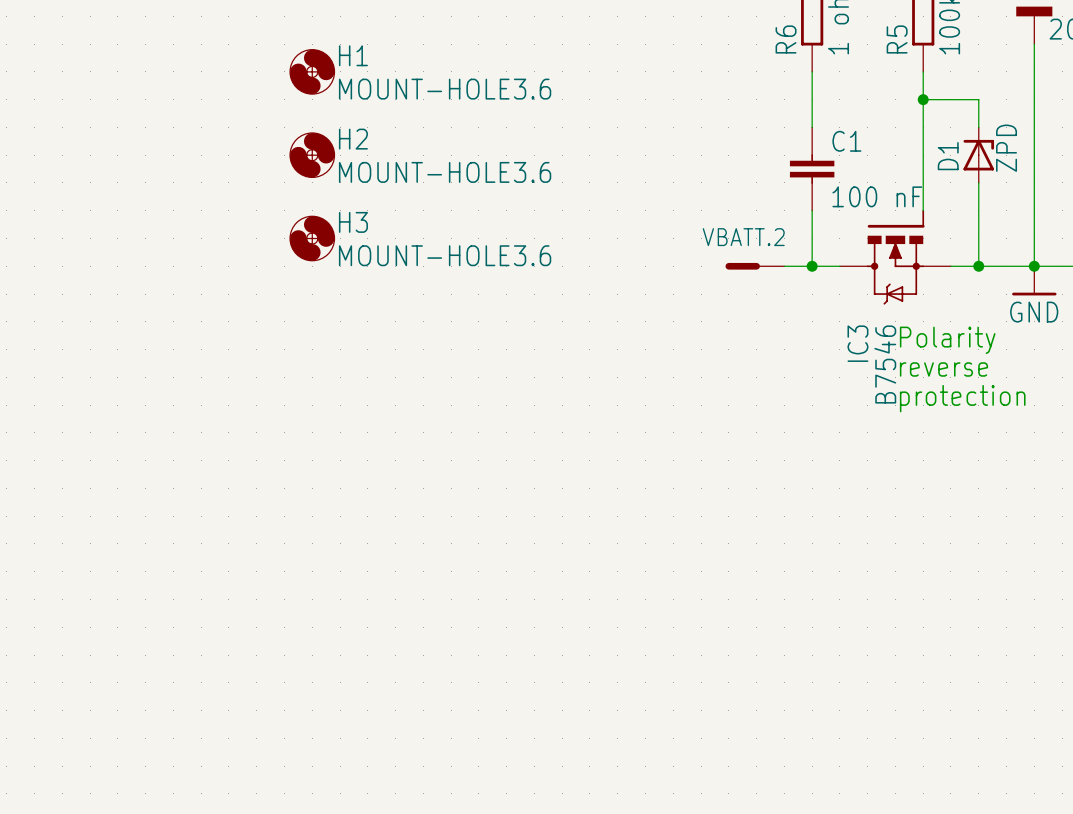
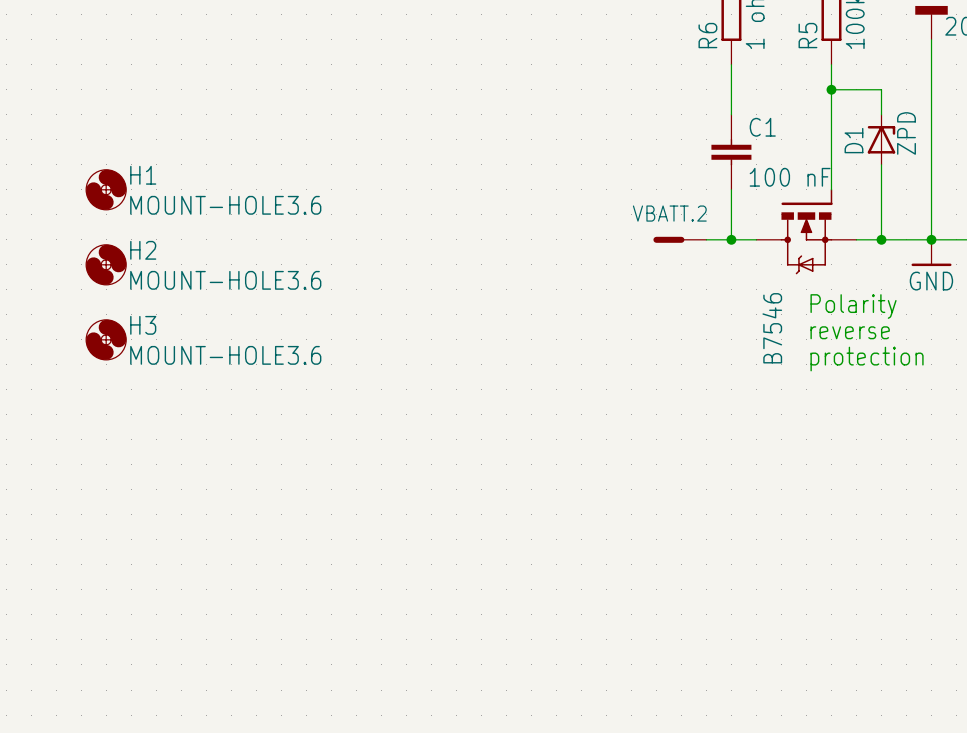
H1 position: (312, 71) -> (106, 189)
H2 position: (312, 155) -> (106, 264)
H3 position: (312, 238) -> (106, 339)
IC3 name: IC3 (857, 343) -> B7546 (772, 328)
IC3 value: B7546 (885, 364) -> none

